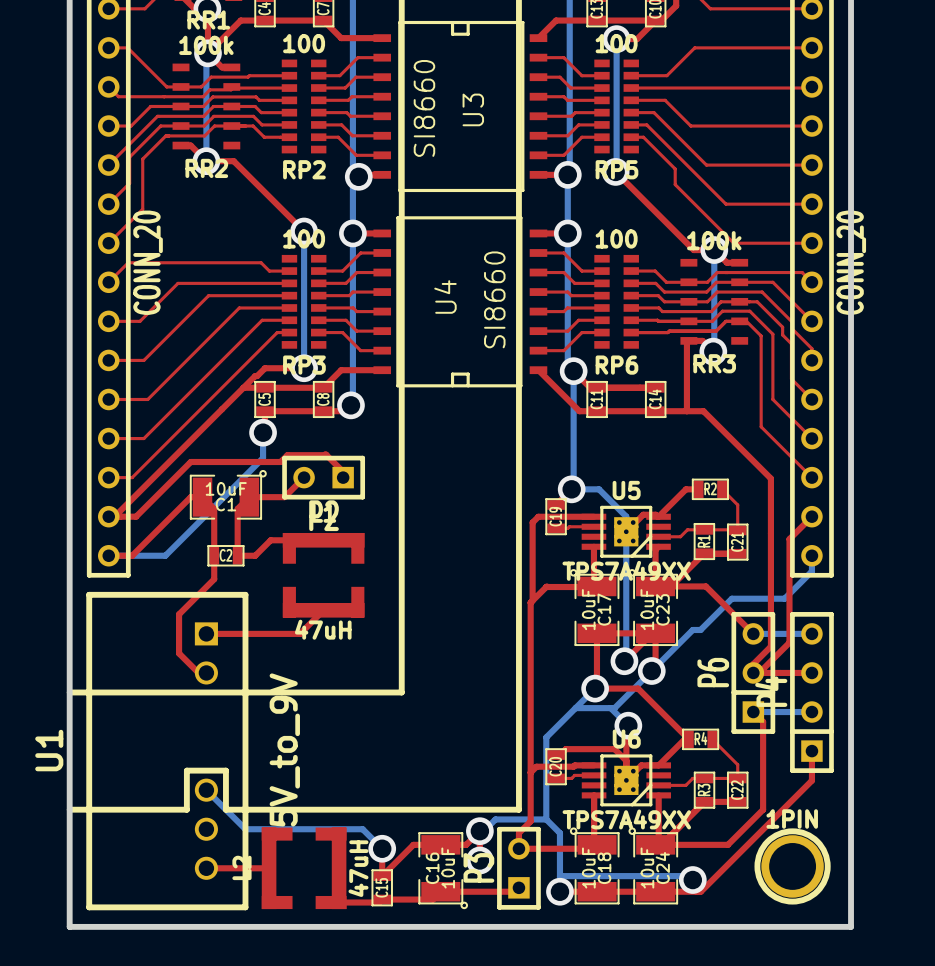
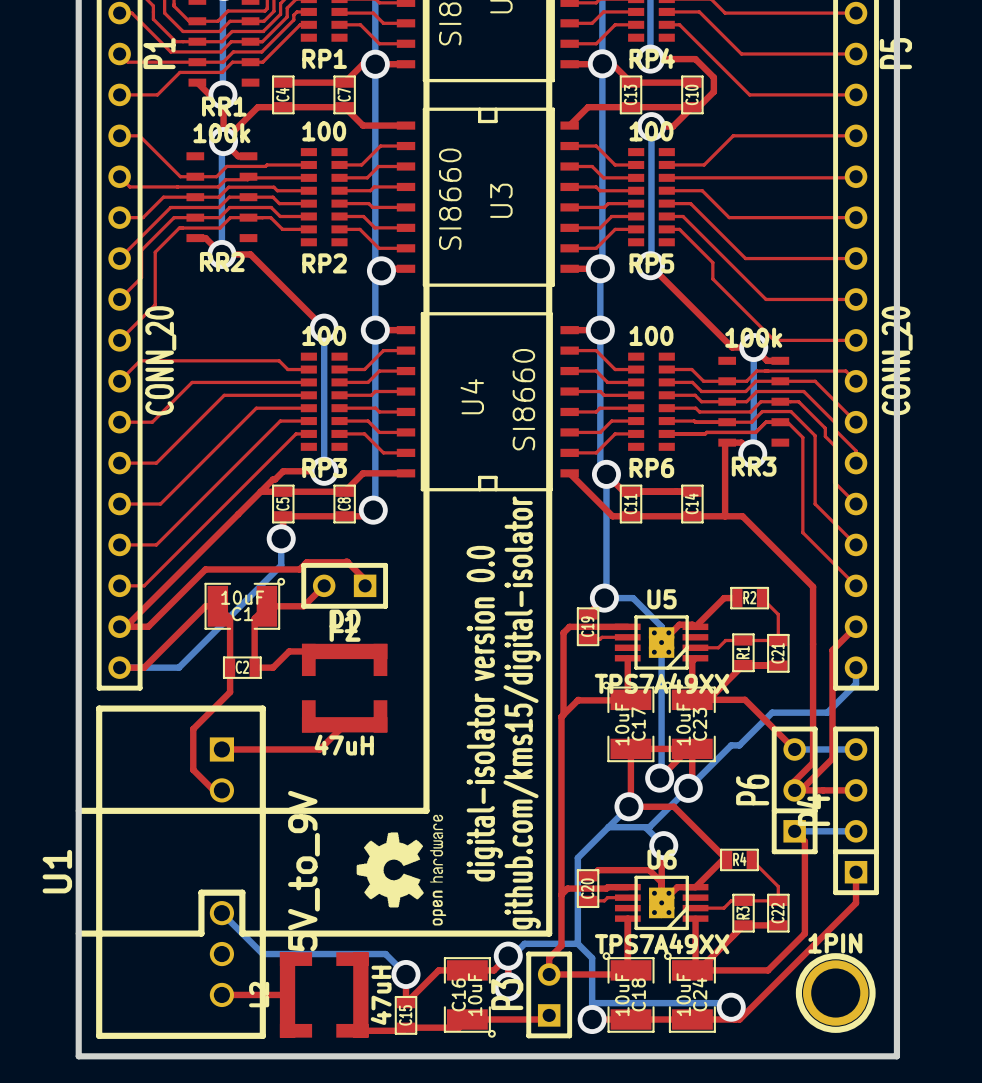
text: none -> github.com/kms15/digital-isolator (522, 712)
text: none -> digital-isolator version 0.0 (484, 713)
drawing: none -> [356, 814, 447, 926]

